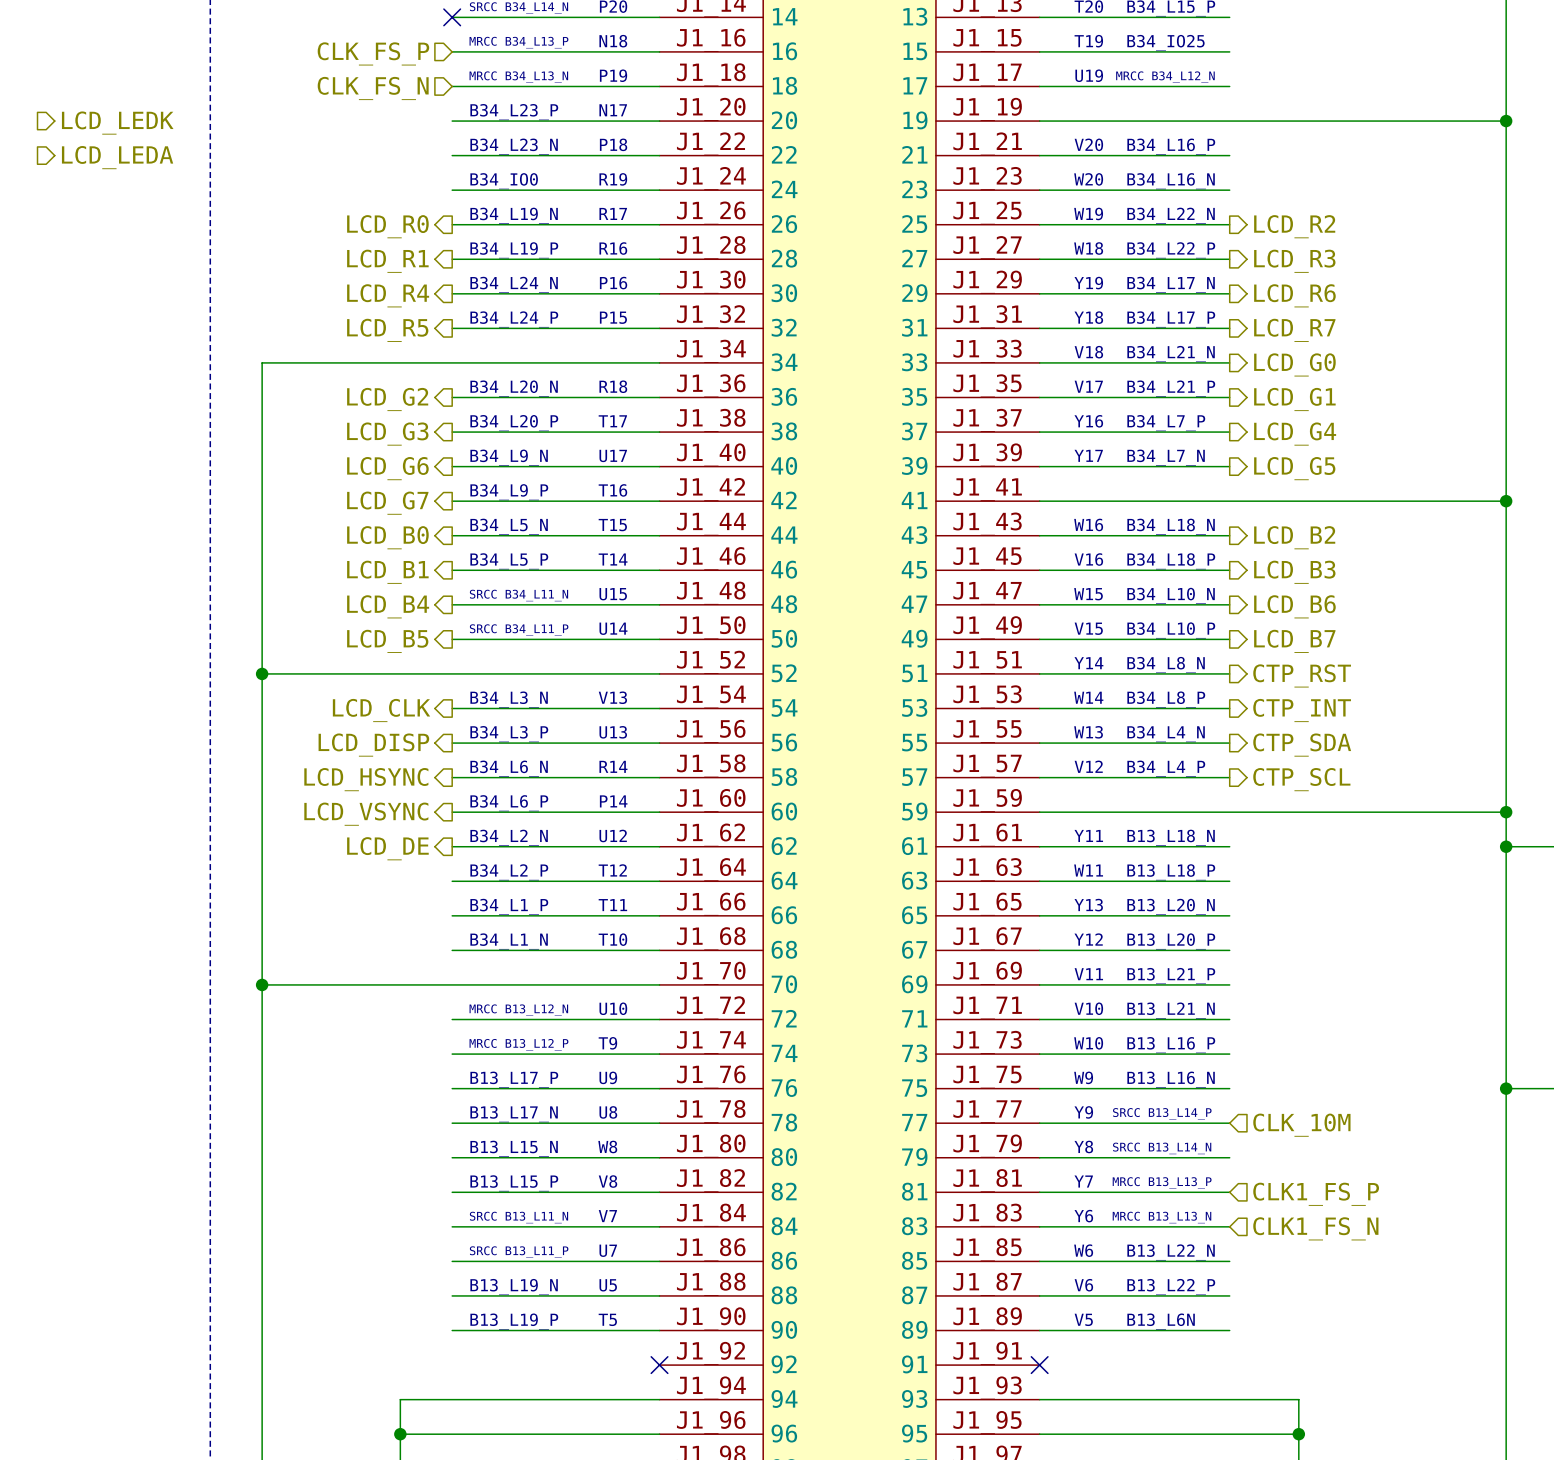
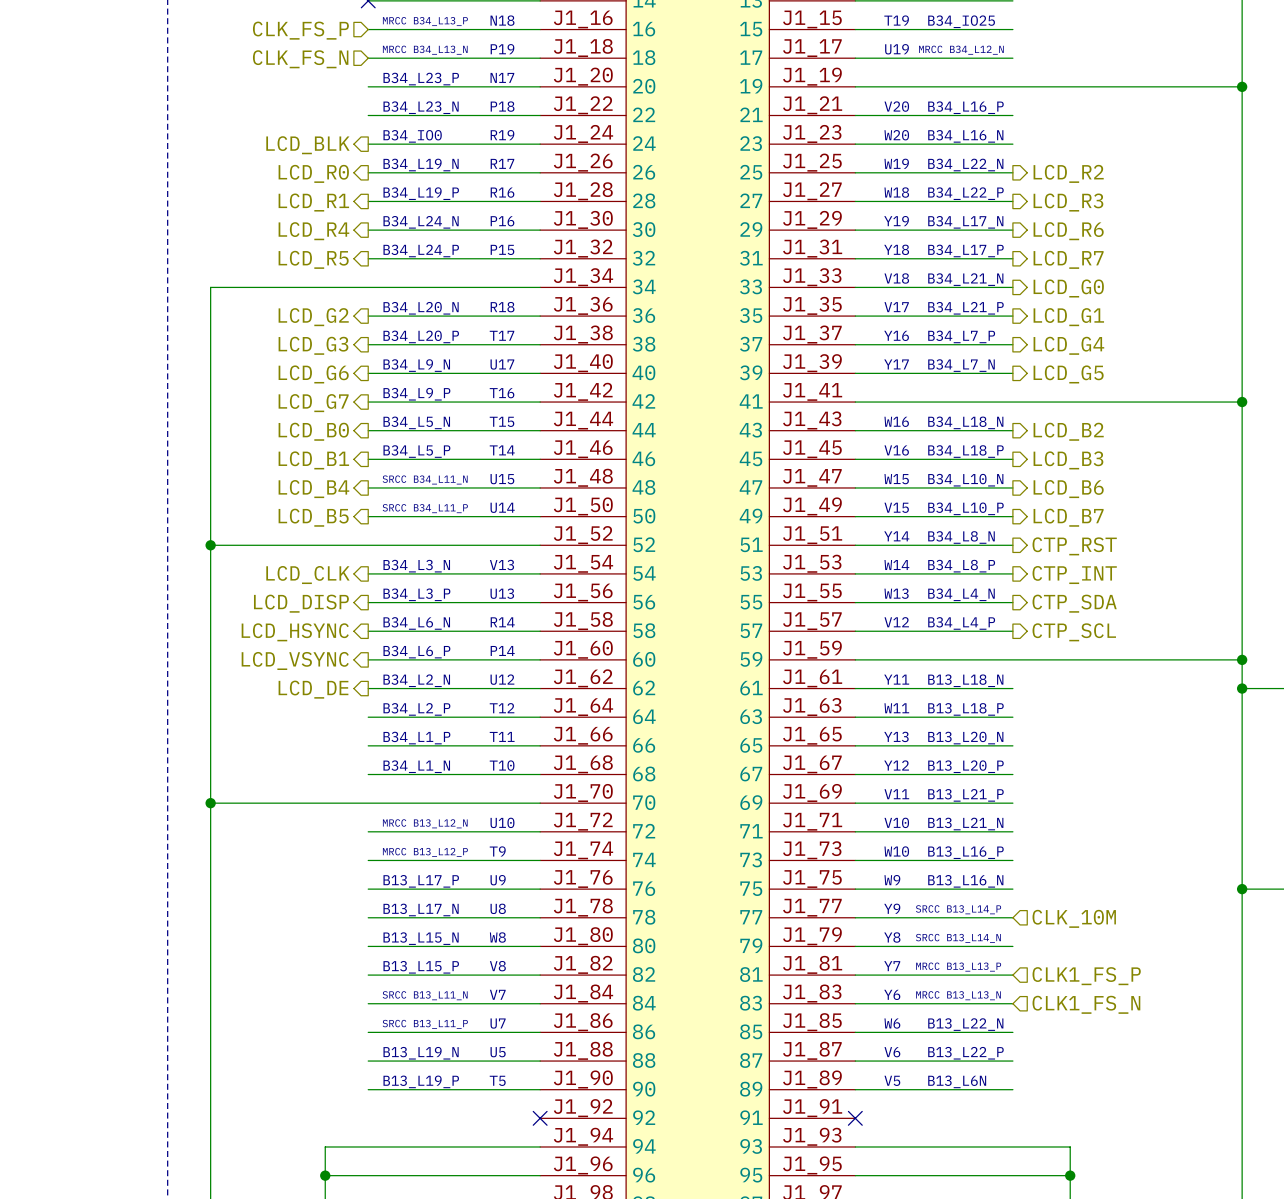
hierarchical label: LCD_LEDK (117, 123) -> none
hierarchical label: LCD_LEDA (117, 157) -> none
hierarchical label: none -> LCD_BLK (307, 145)

